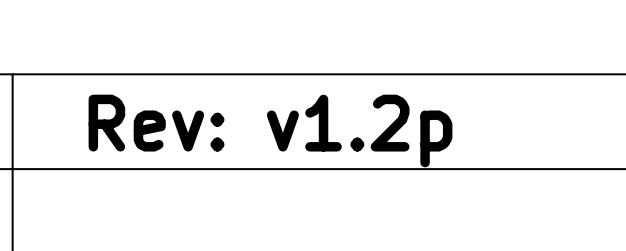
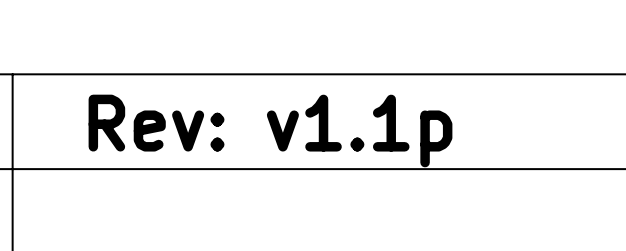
title block: Rev: v1.2p (270, 131) -> Rev: v1.1p (270, 131)

